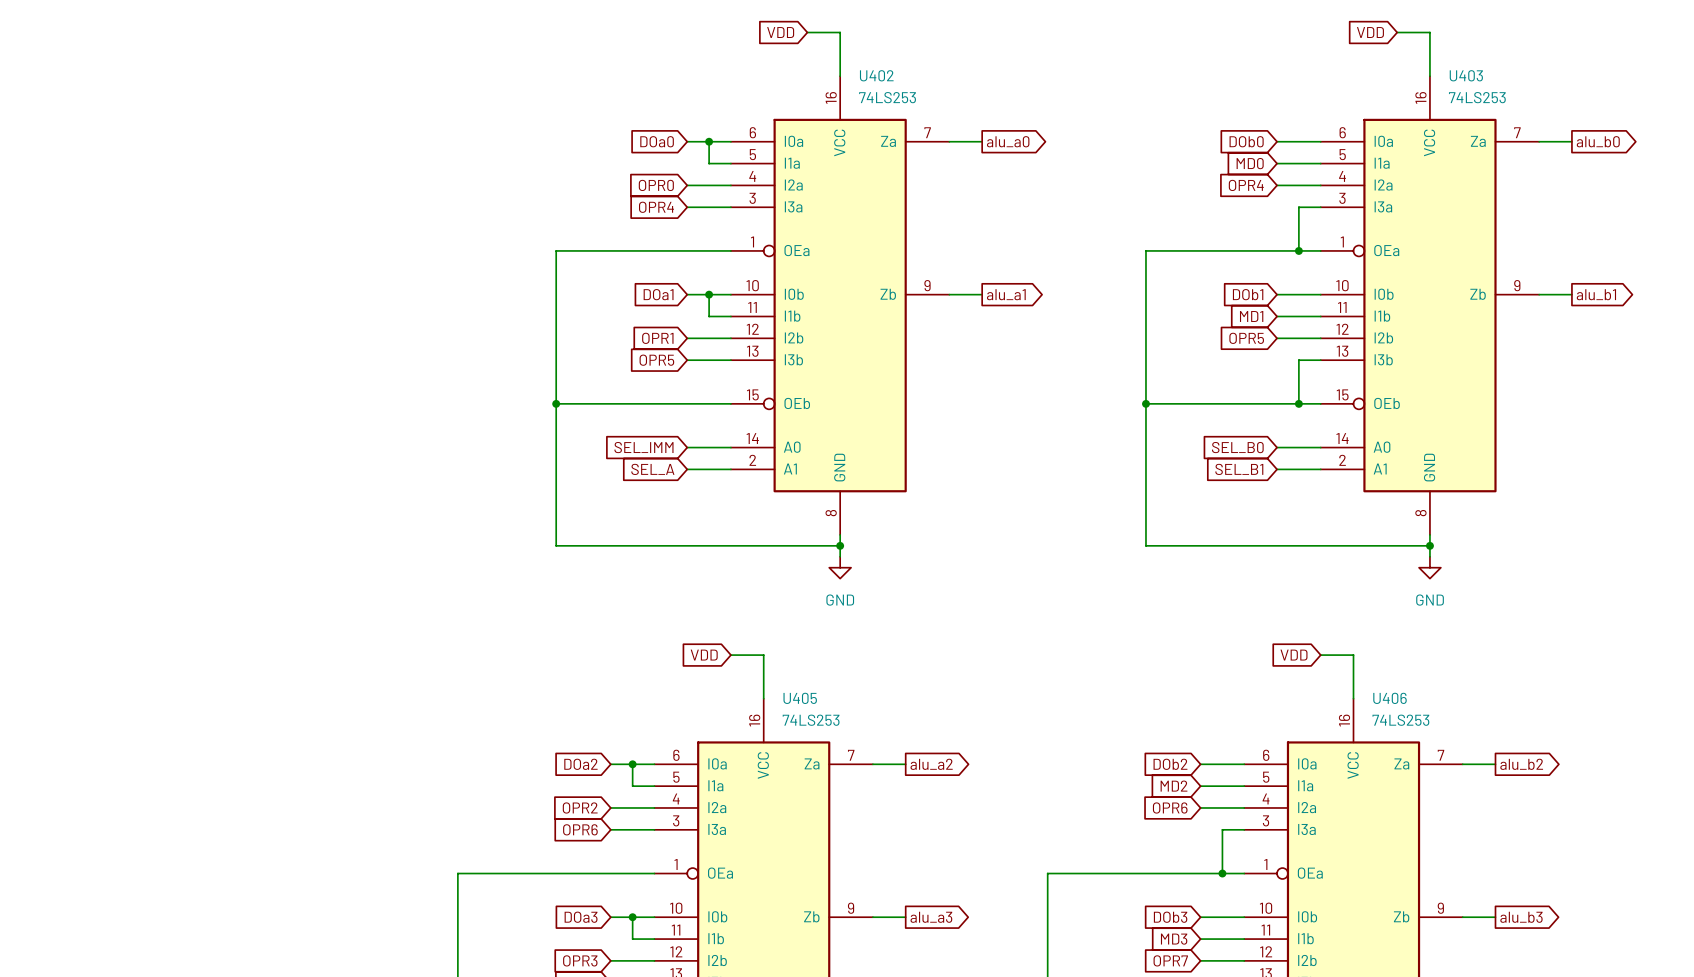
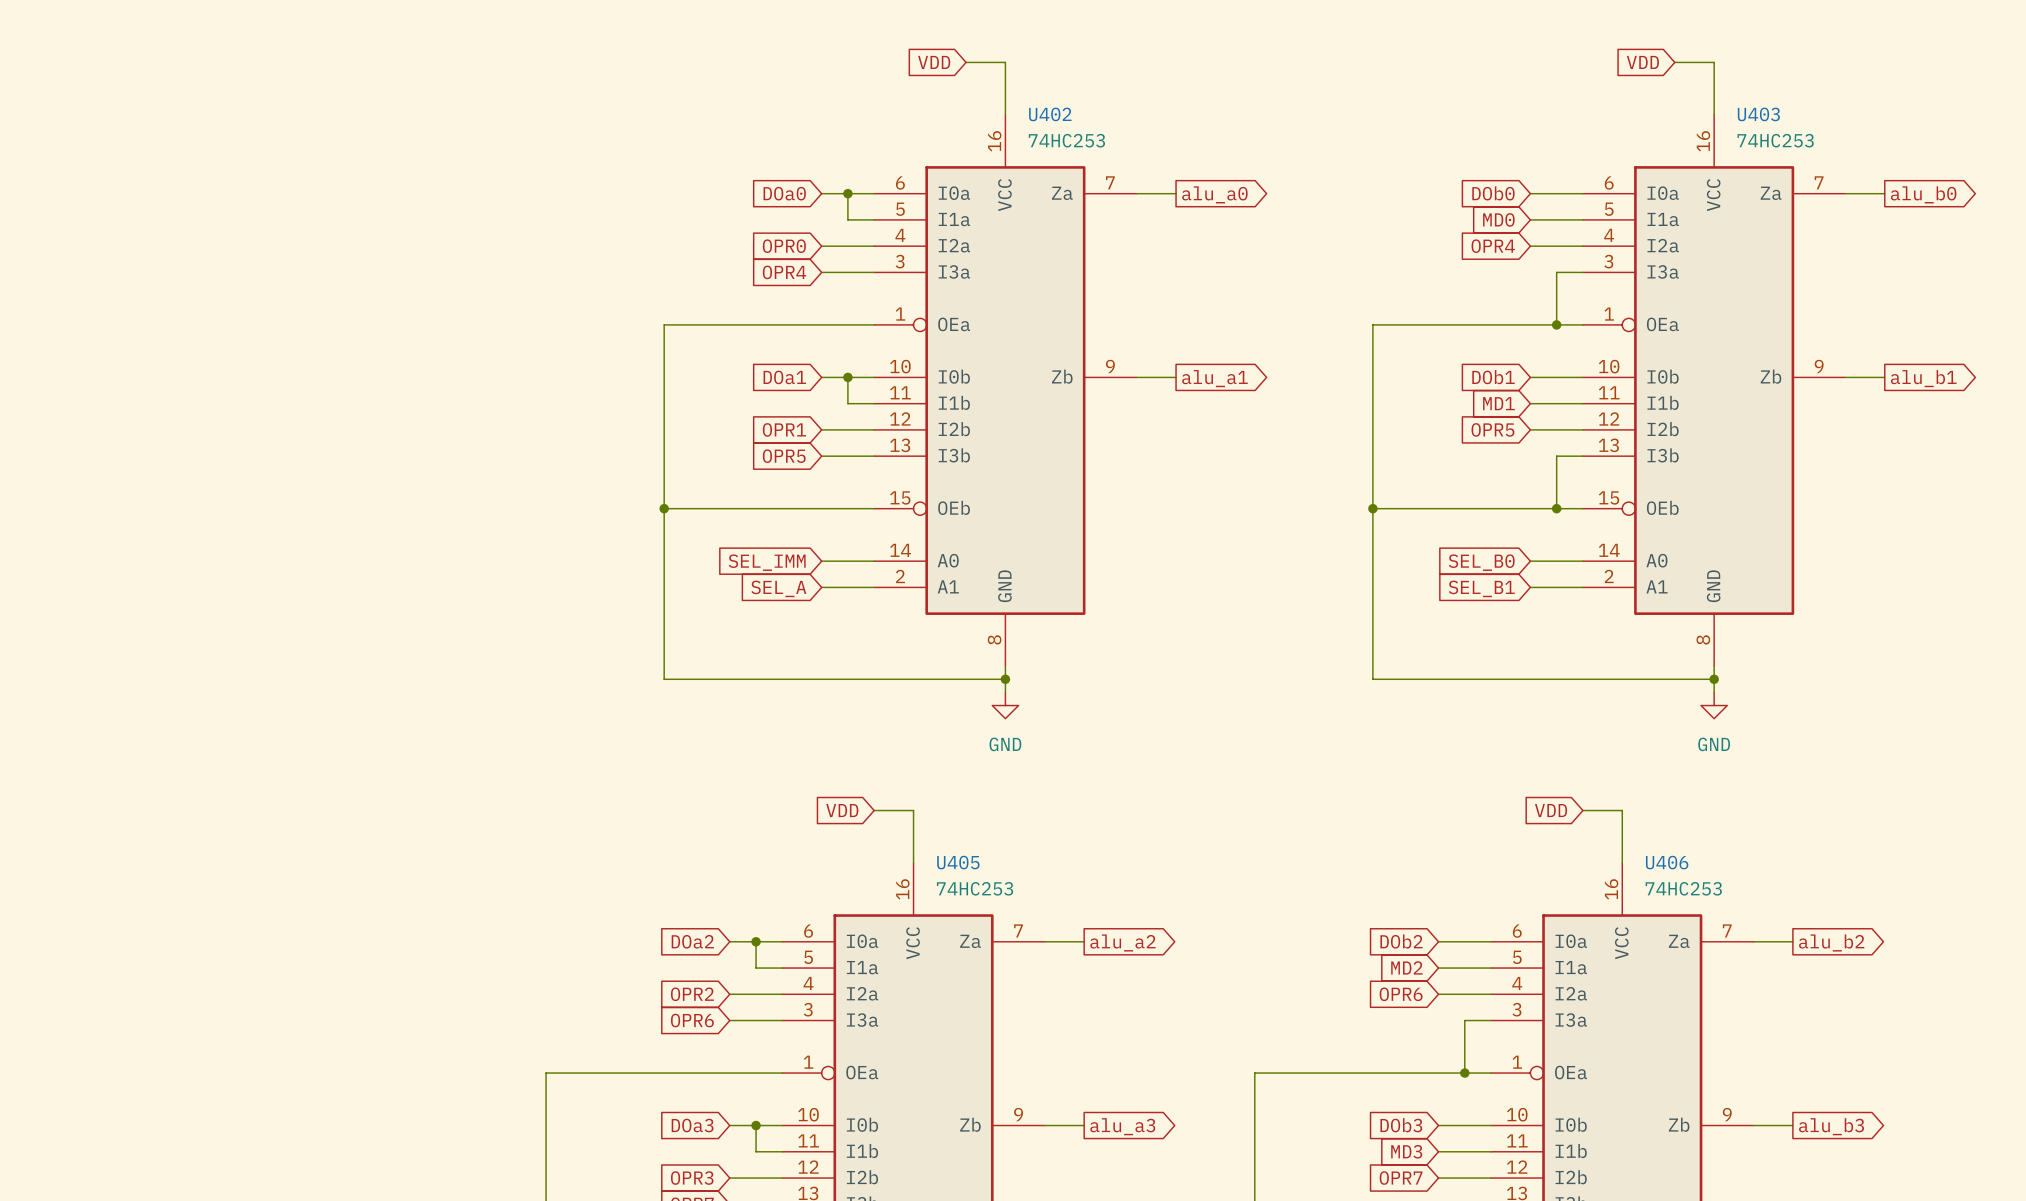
U402 value: 74LS253 (887, 97) -> 74HC253 (1066, 140)
U403 value: 74LS253 (1477, 97) -> 74HC253 (1775, 140)
U405 value: 74LS253 (811, 720) -> 74HC253 (975, 888)
U406 value: 74LS253 (1400, 720) -> 74HC253 (1683, 888)

